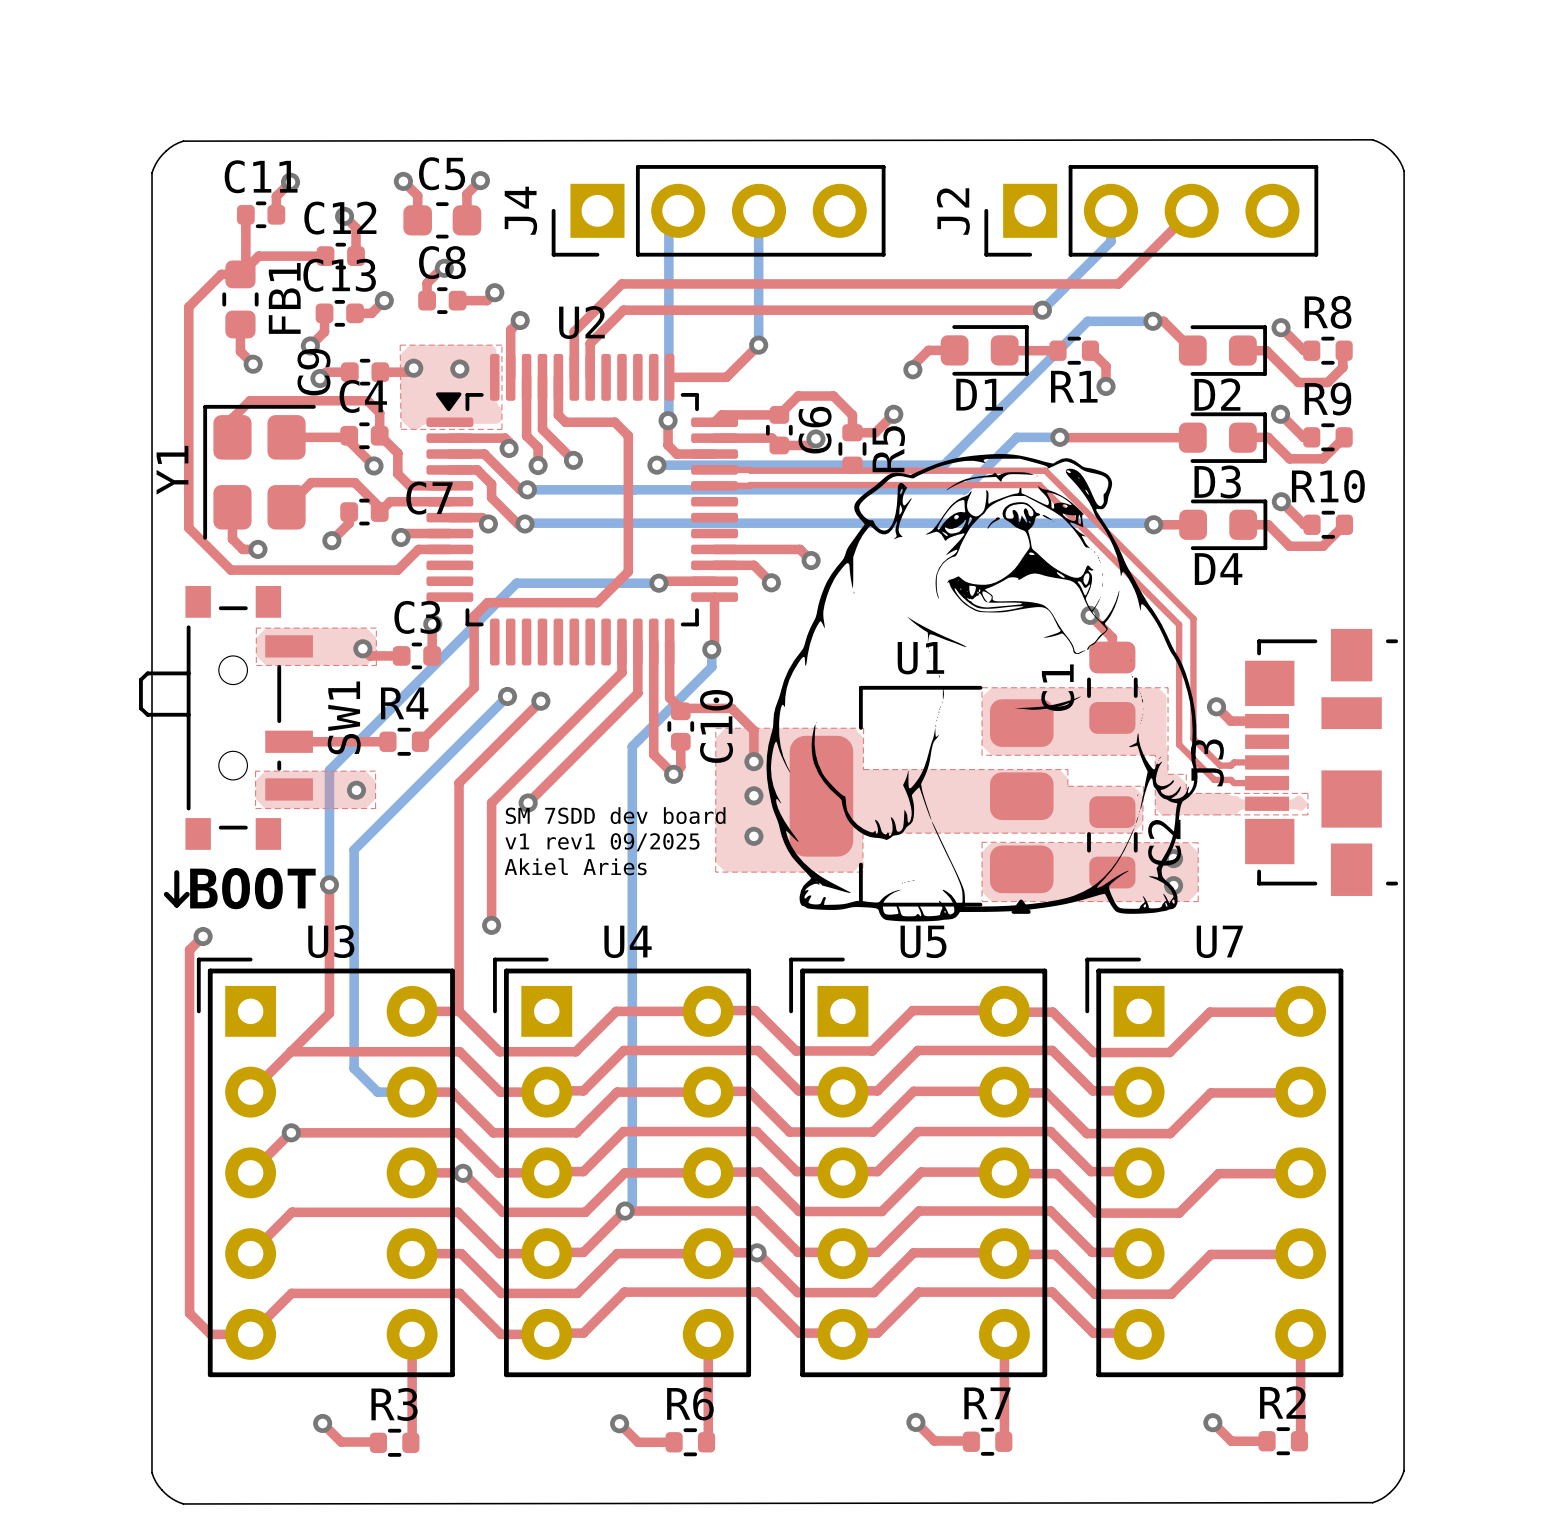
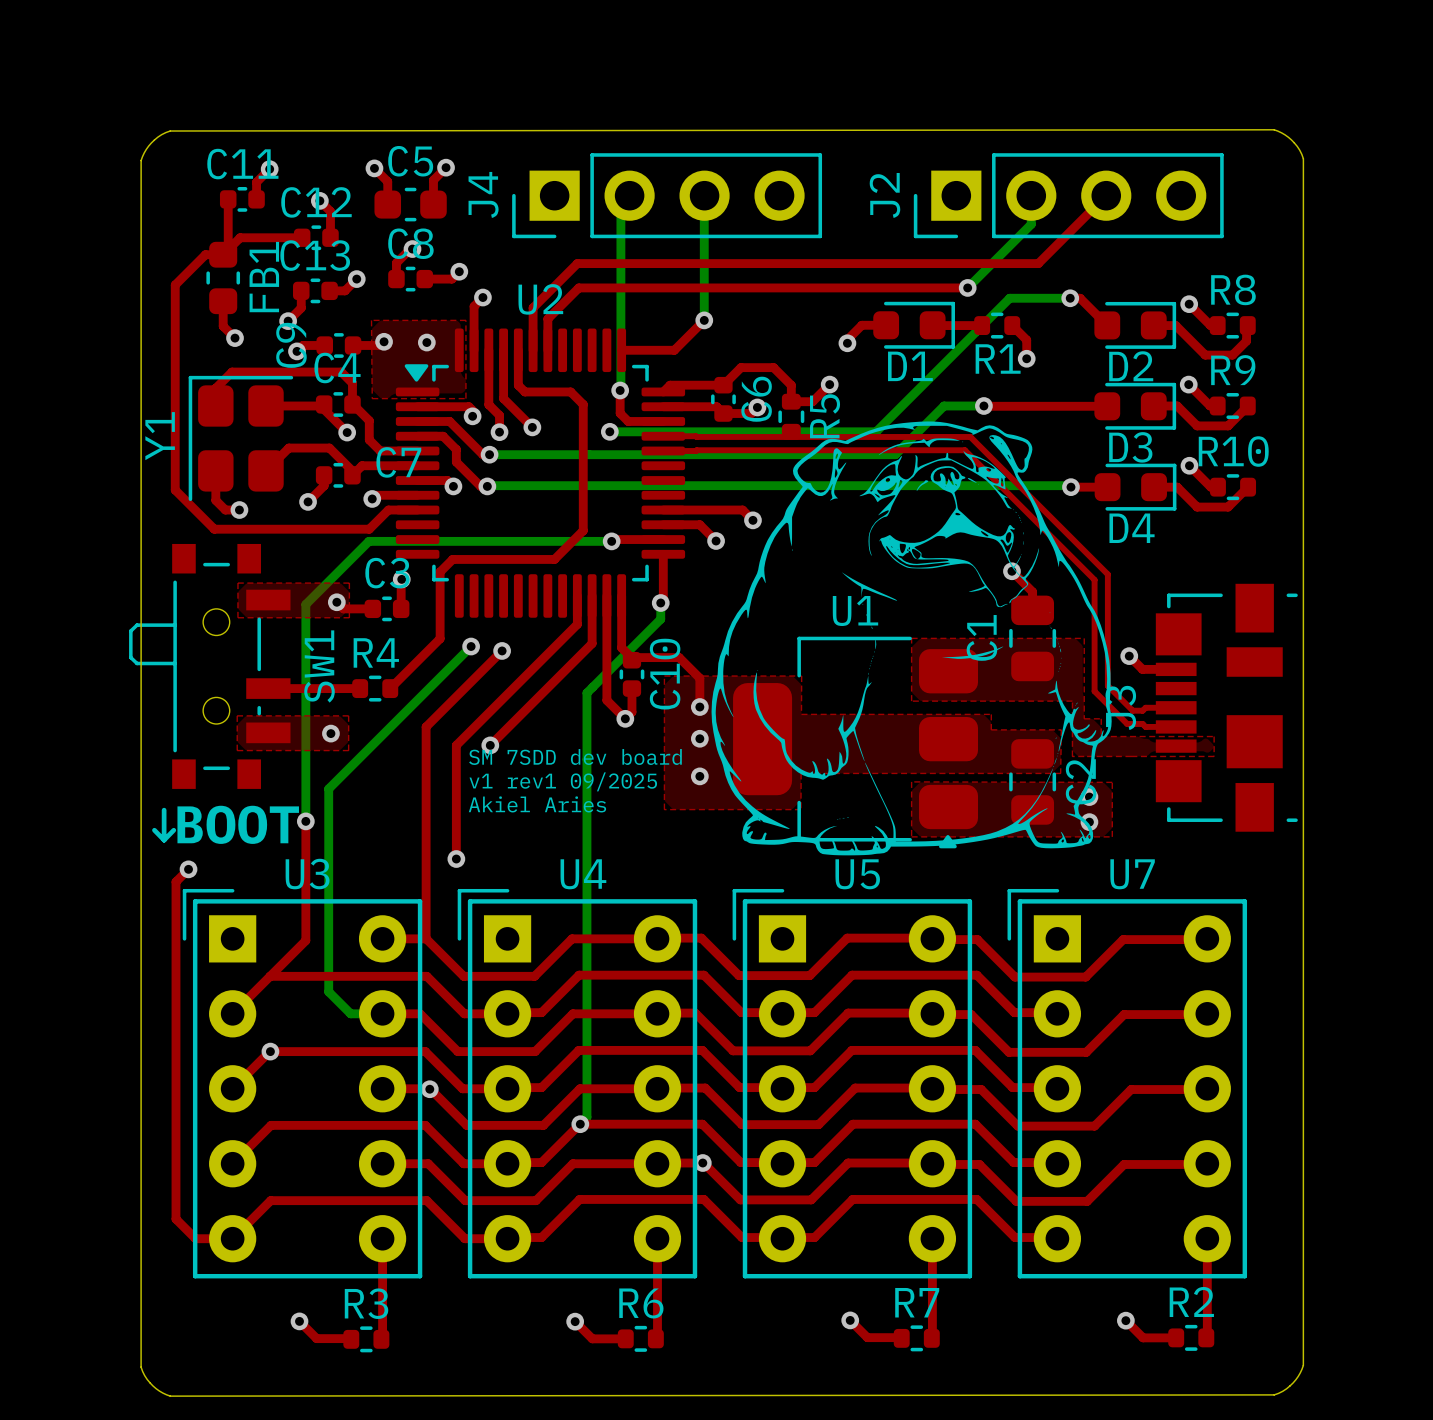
bottom track: (516, 583) (329, 770) -> (479, 541) (368, 541) (305, 604) (305, 715)

